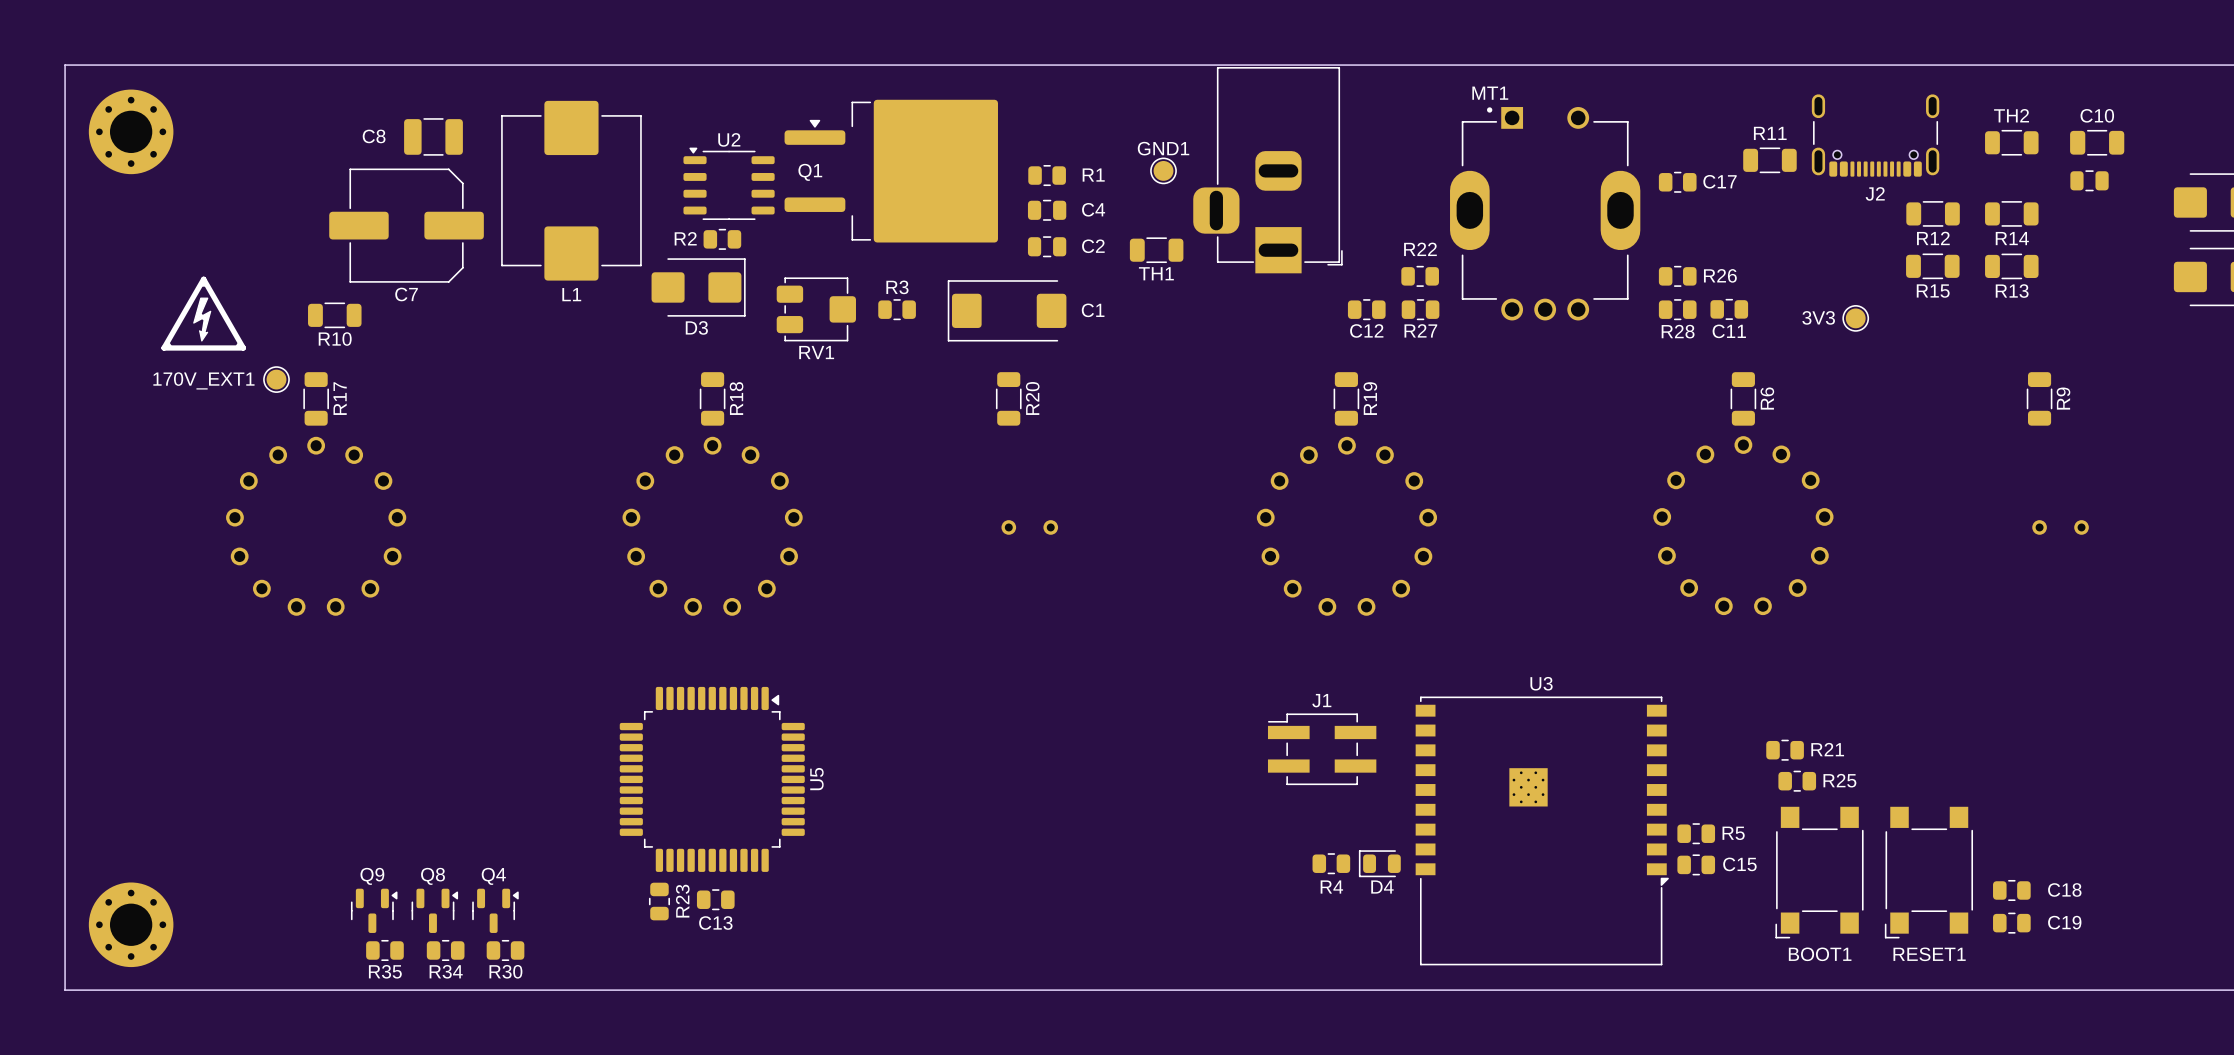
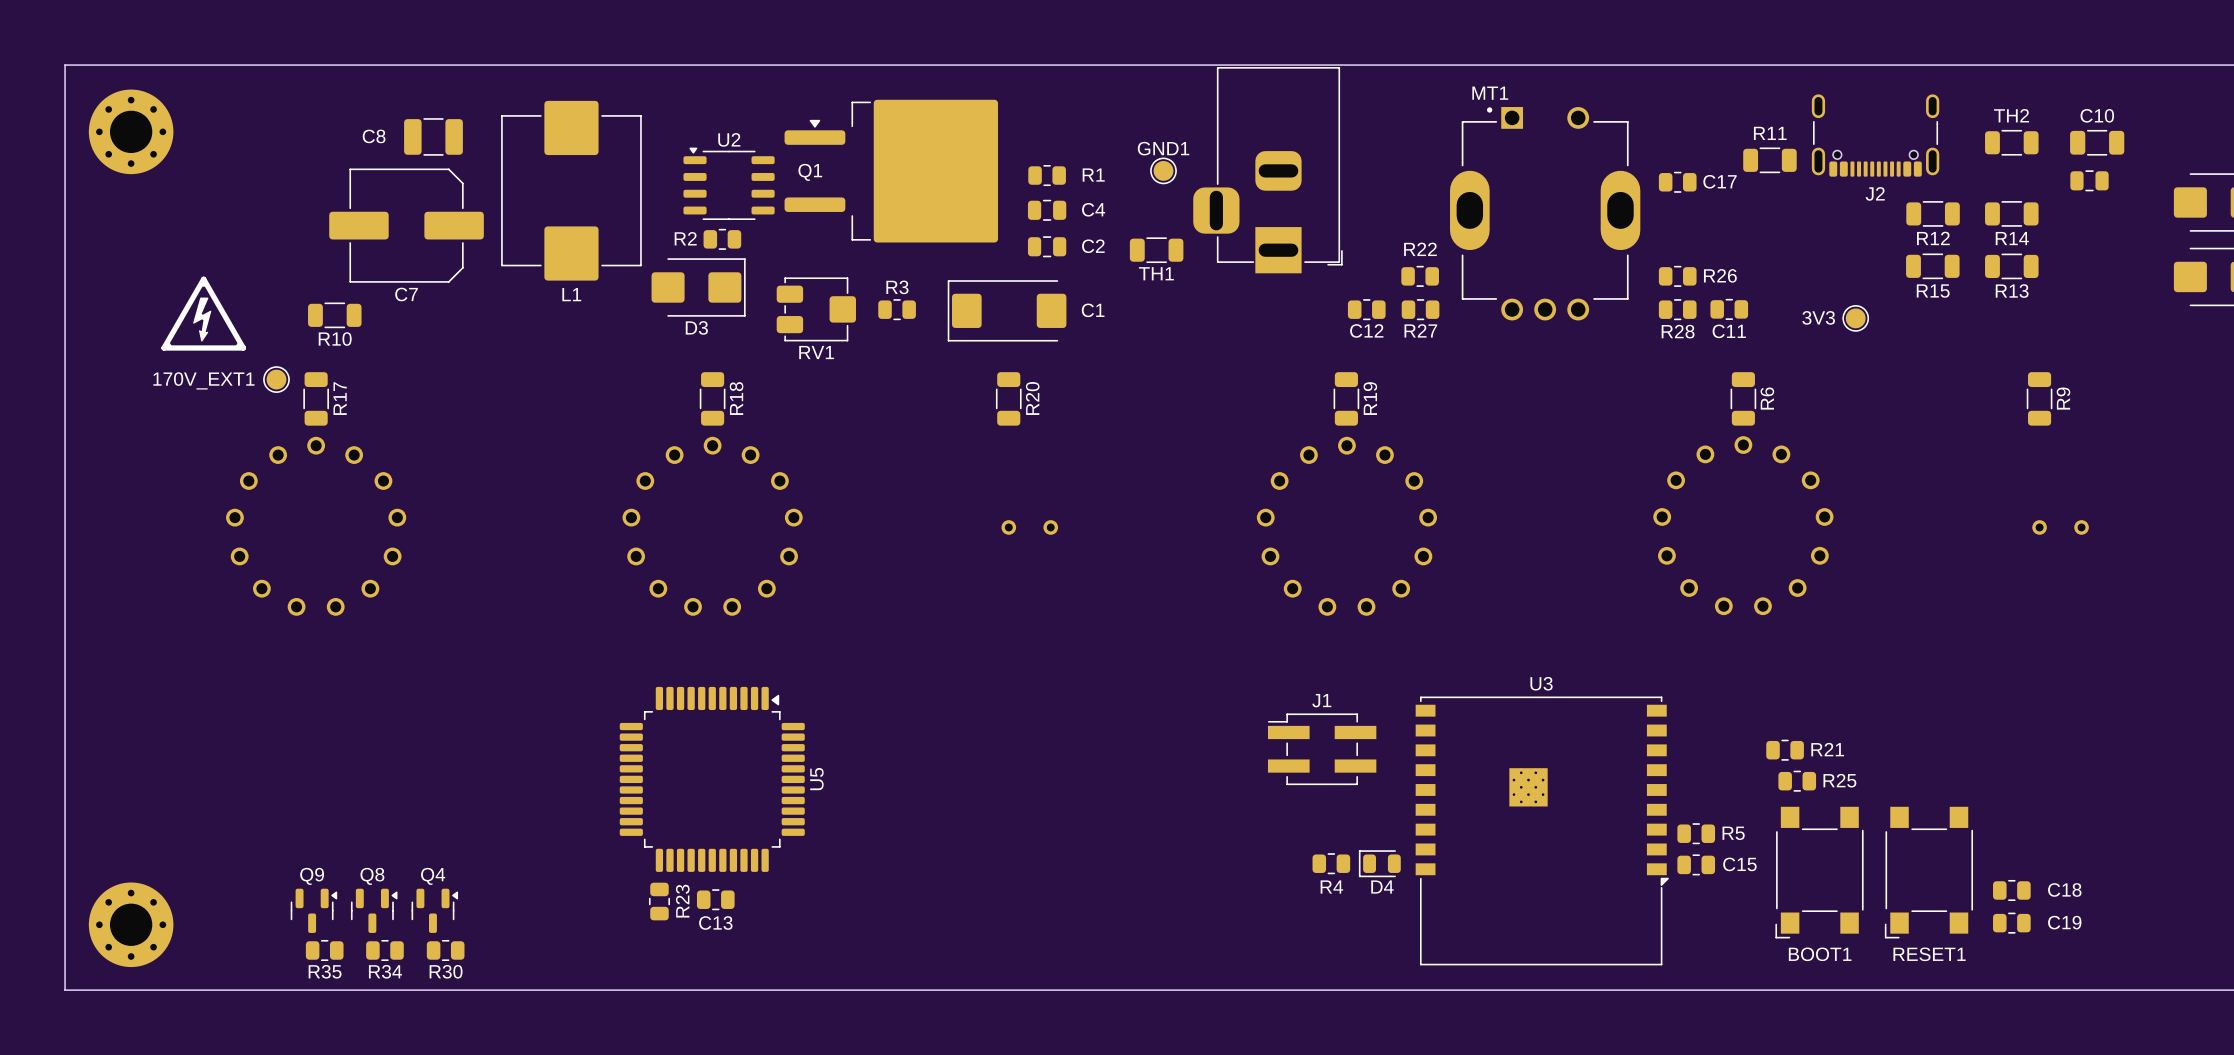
Q9 name: Q9 (372, 876) -> Q8 (372, 876)
Q8 name: Q8 (433, 876) -> Q4 (433, 876)
Q9: none -> (313, 910)
Q4: (495, 910) -> none
R35: none -> (324, 950)
R30: (505, 950) -> none
R35 name: R35 (385, 971) -> R34 (385, 971)
R34 name: R34 (446, 971) -> R30 (446, 971)

